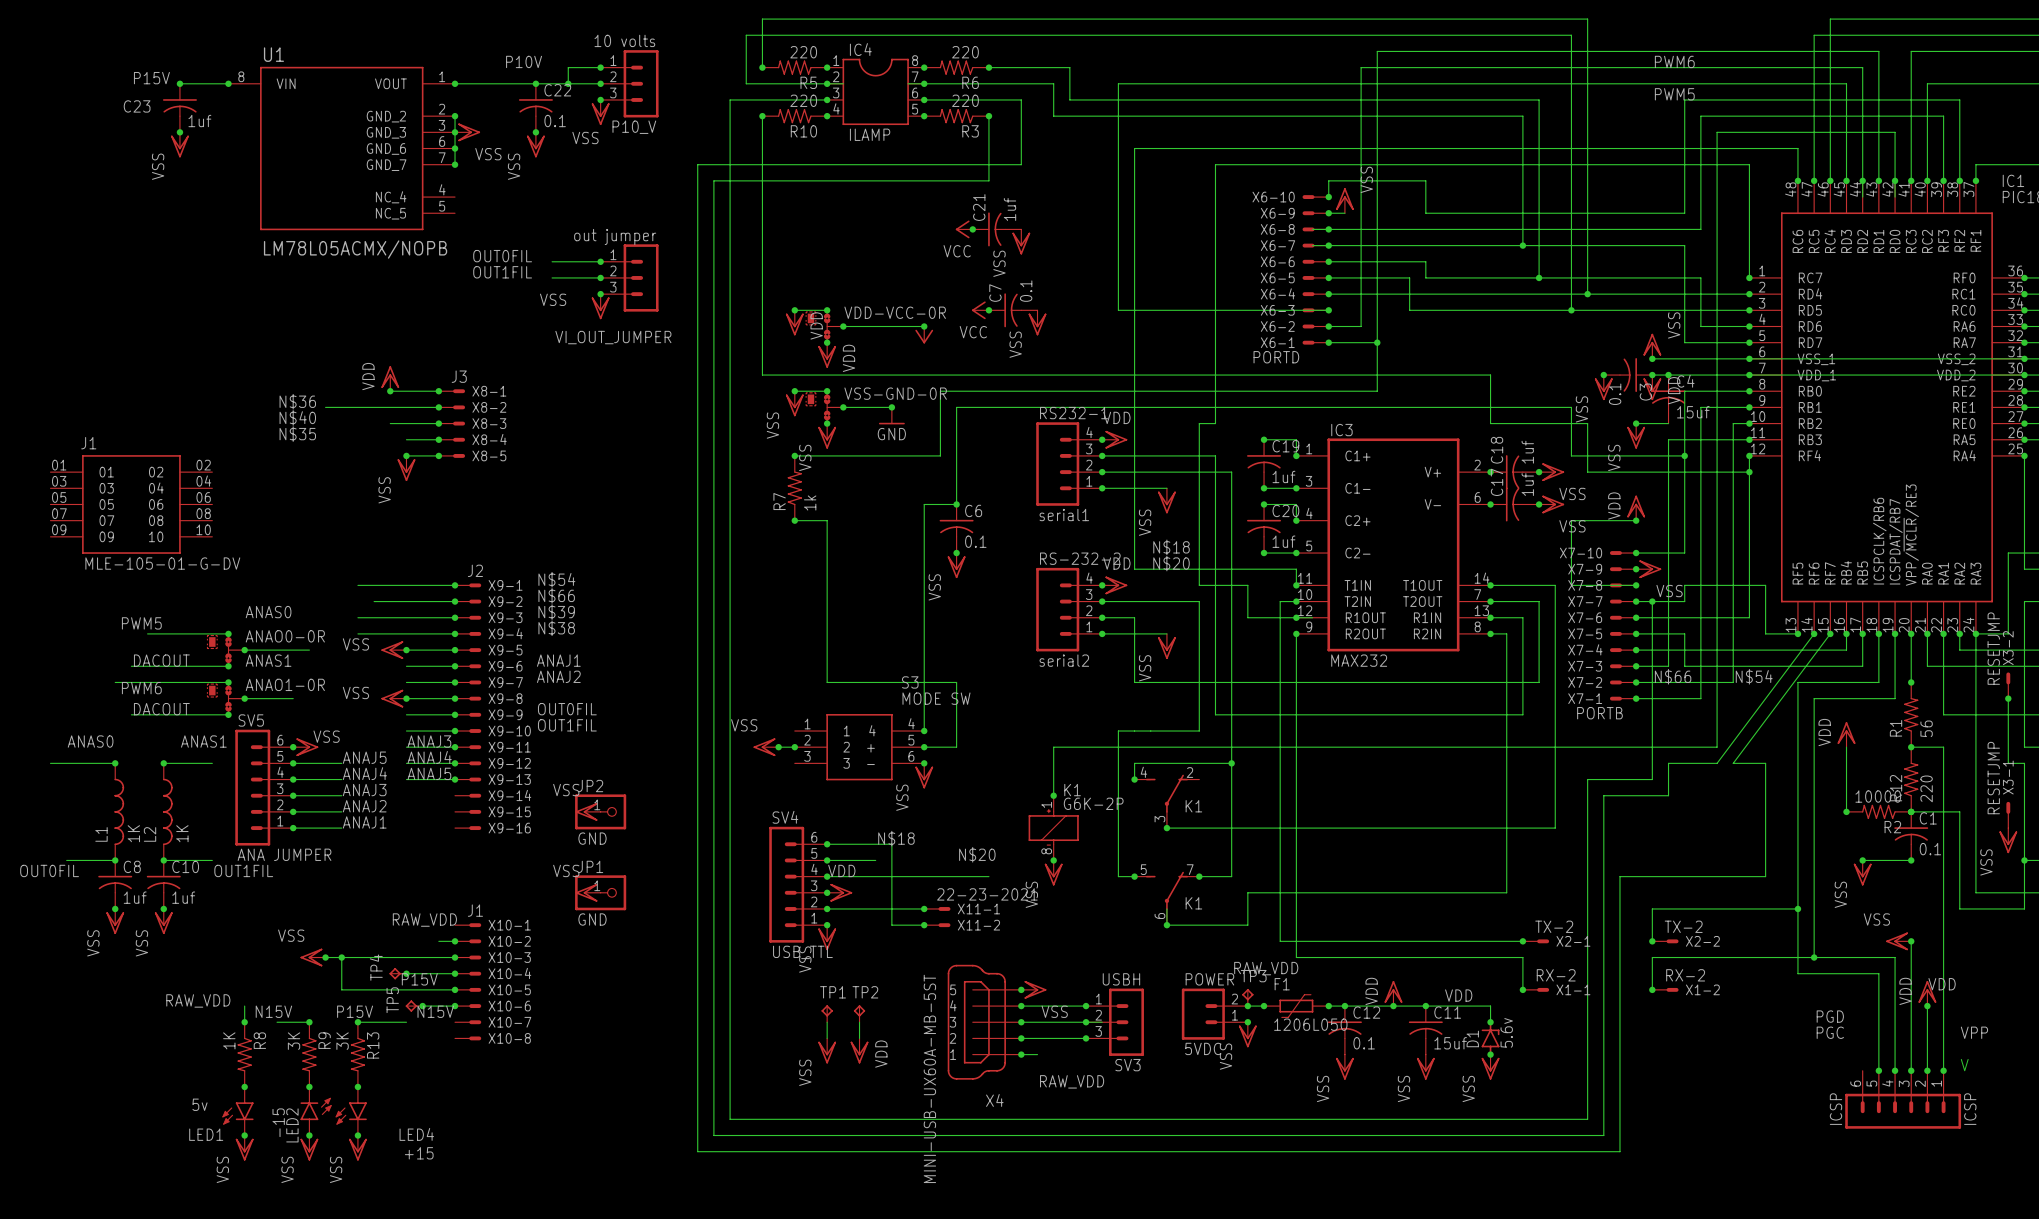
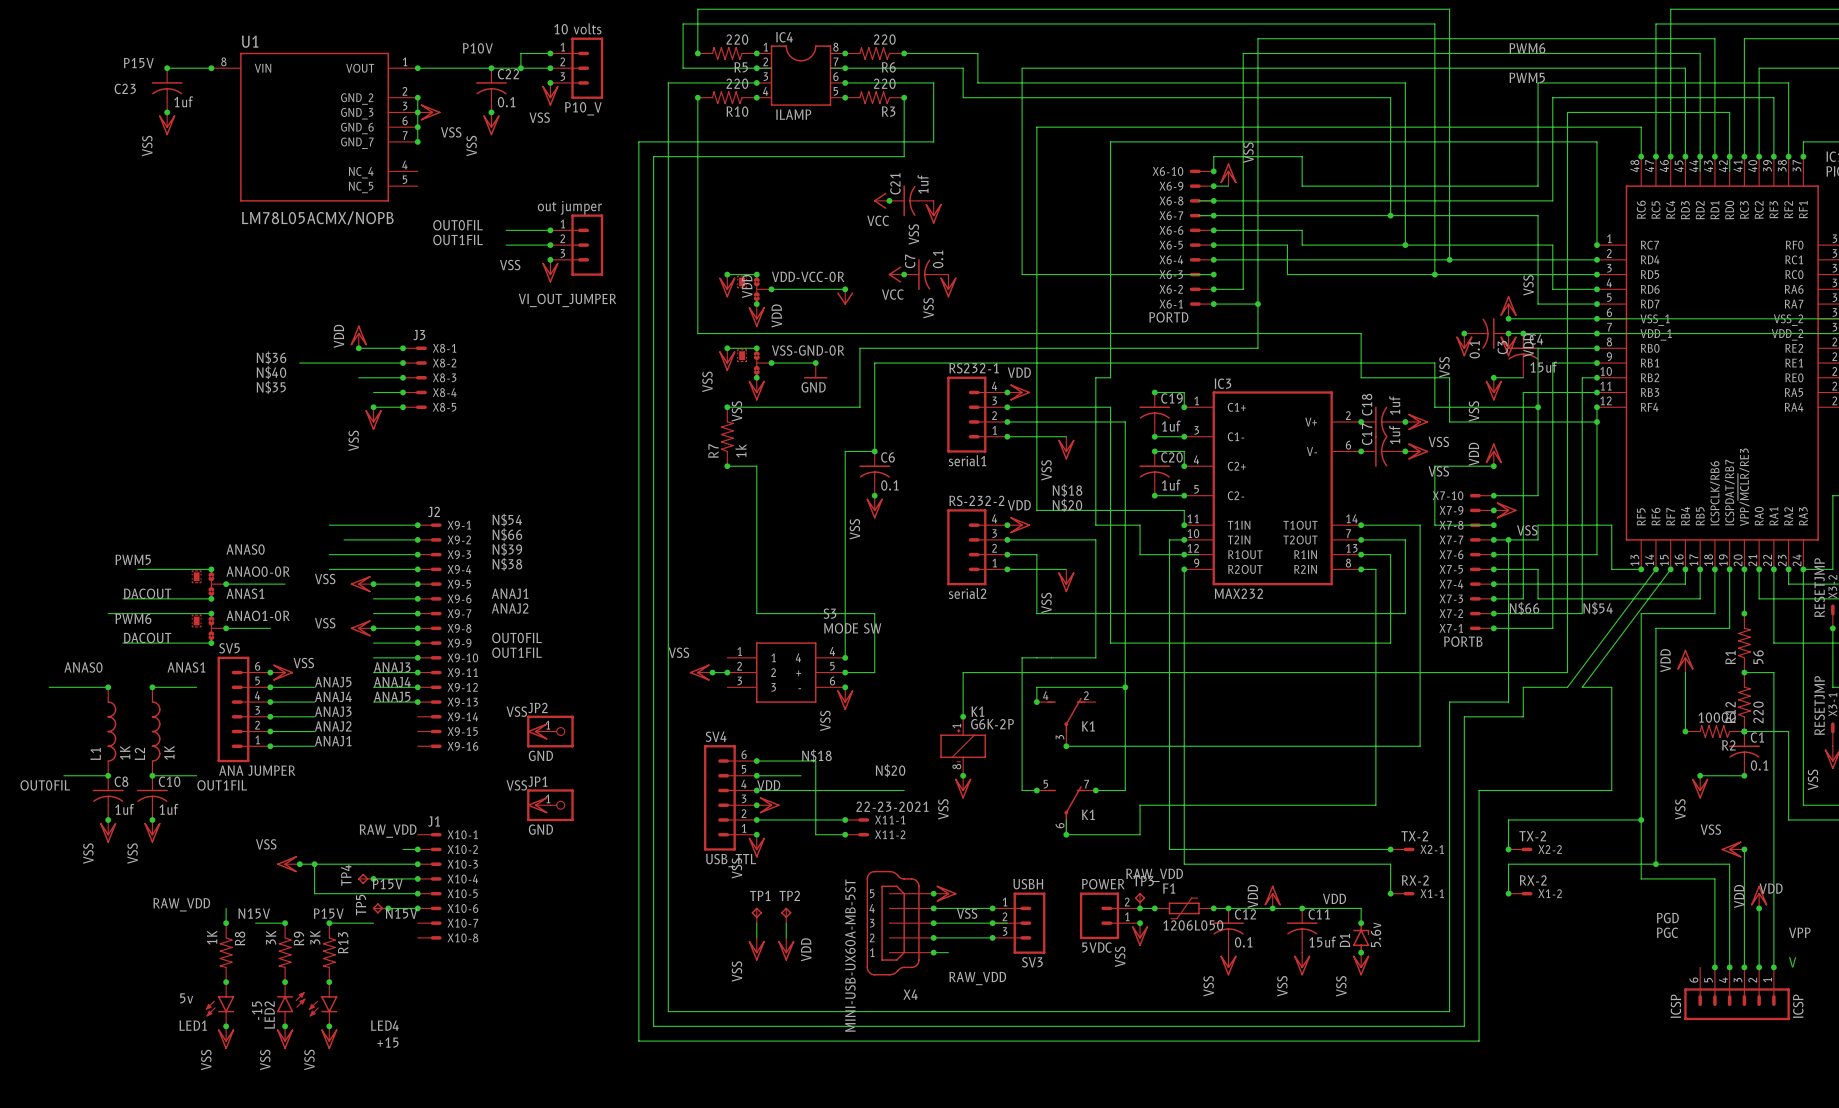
J1: MLE-105-01-G-DV (131, 504) -> none

